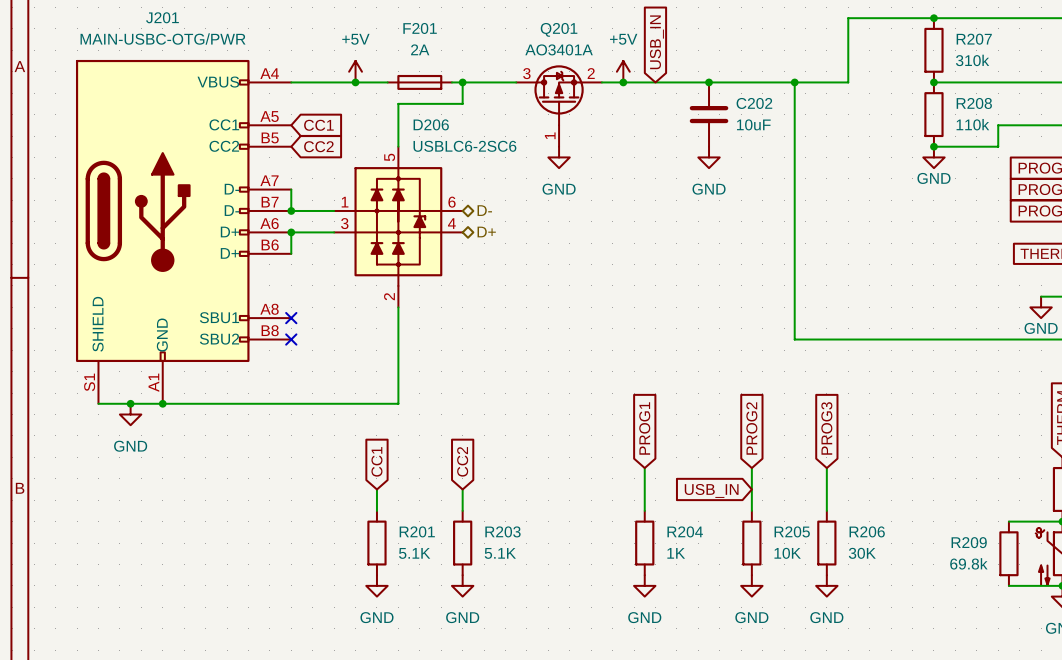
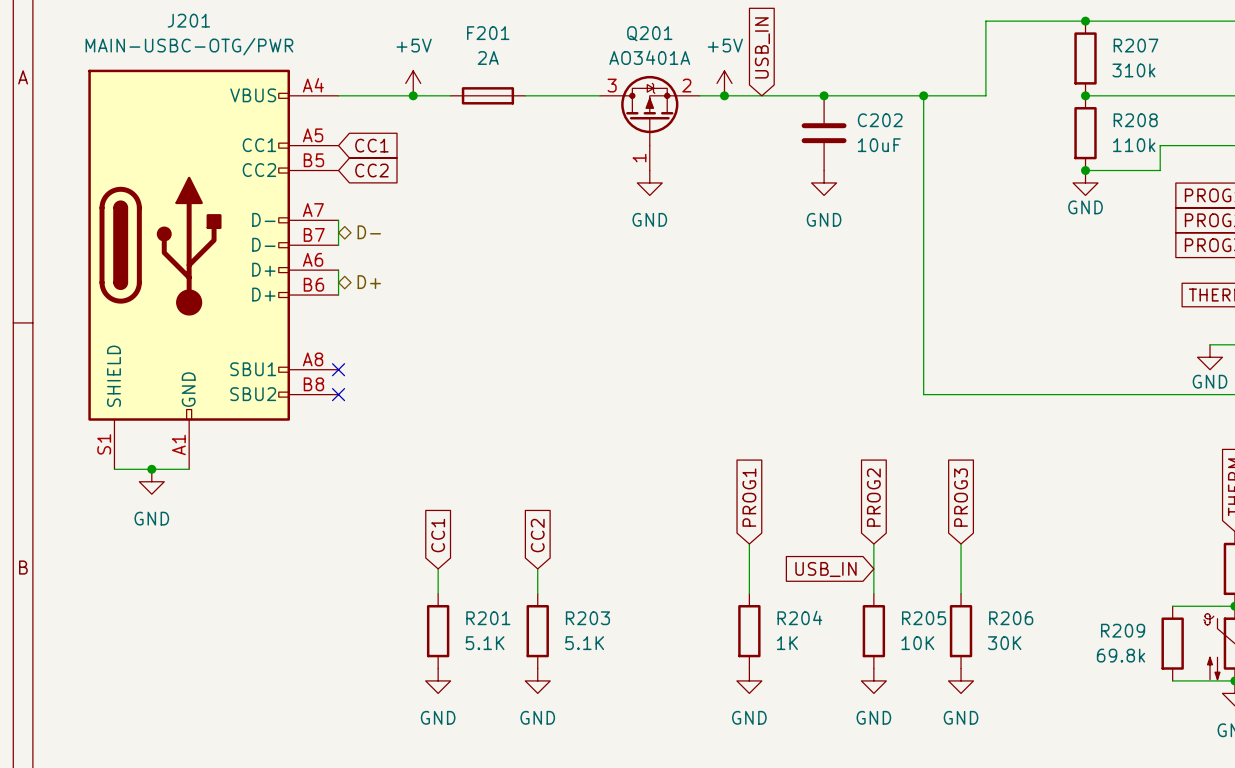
wire: (462, 82) (462, 103) (398, 103) (398, 146) -> none
junction: (462, 82) -> none
wire: (291, 210) (334, 210) -> none
junction: (291, 210) -> none
hierarchical label position: D- (484, 210) -> D- (369, 232)
D206: USBLC6-2SC6 (398, 227) -> none
wire: (291, 232) (334, 232) -> none
junction: (291, 232) -> none
hierarchical label position: D+ (486, 232) -> D+ (369, 282)
wire: (398, 307) (398, 403) (162, 403) -> none
junction: (162, 403) -> none

